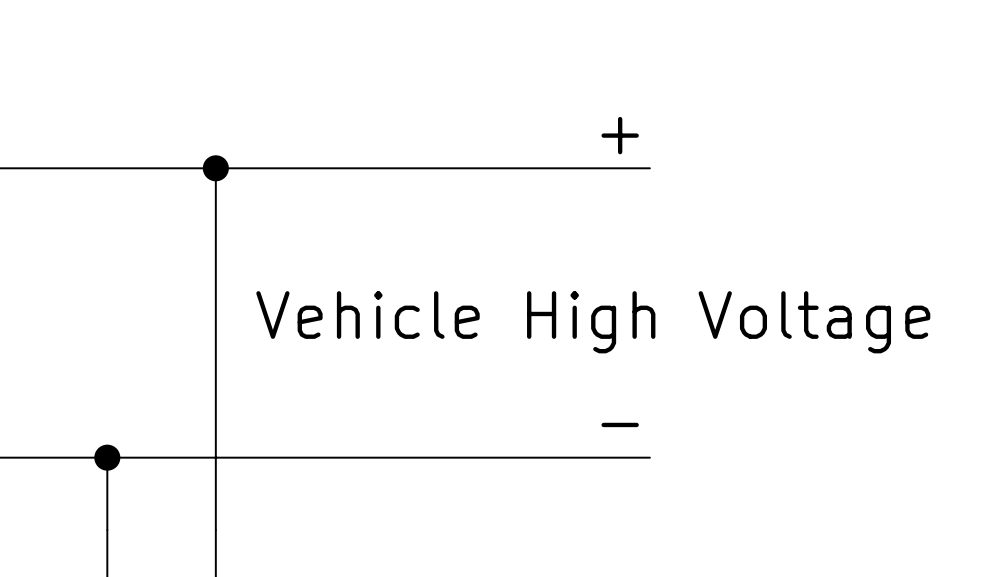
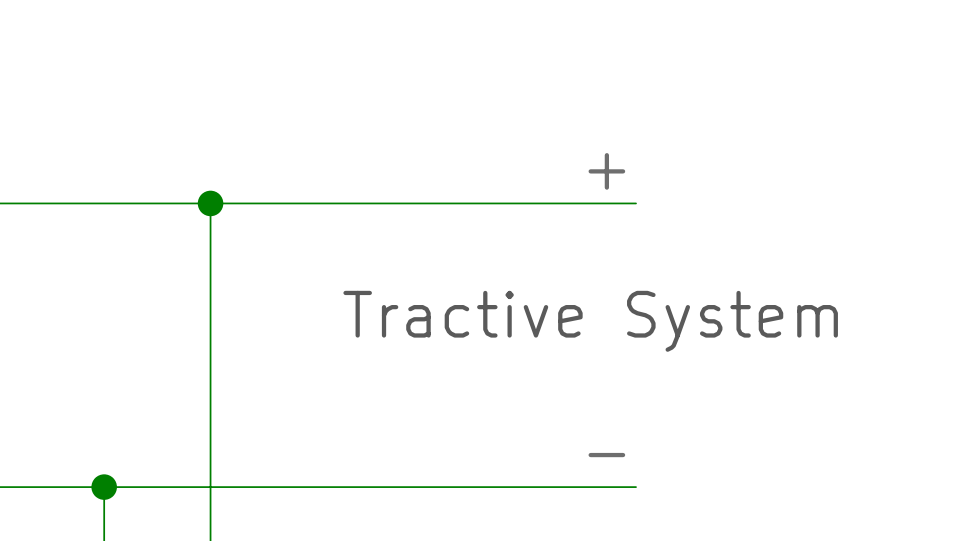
text: none -> Tractive System (590, 321)
text: Vehicle High Voltage (593, 322) -> none

